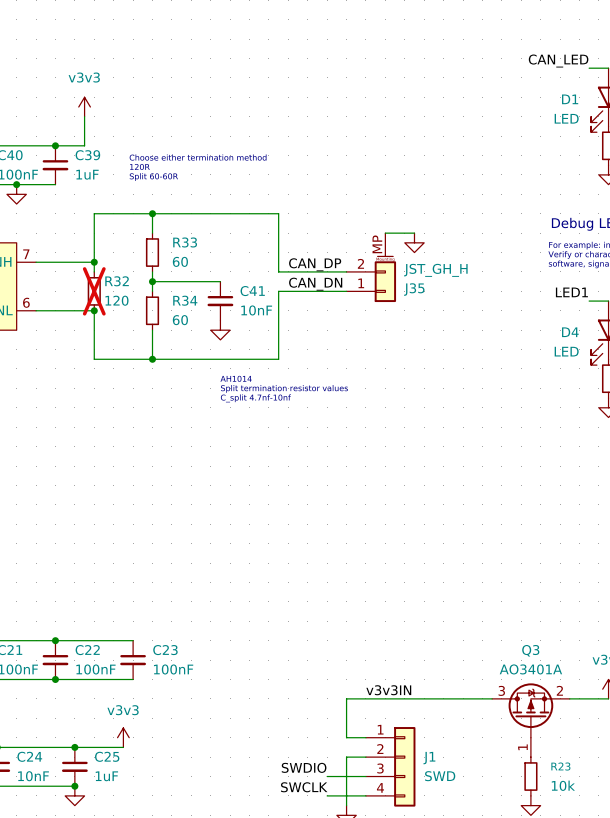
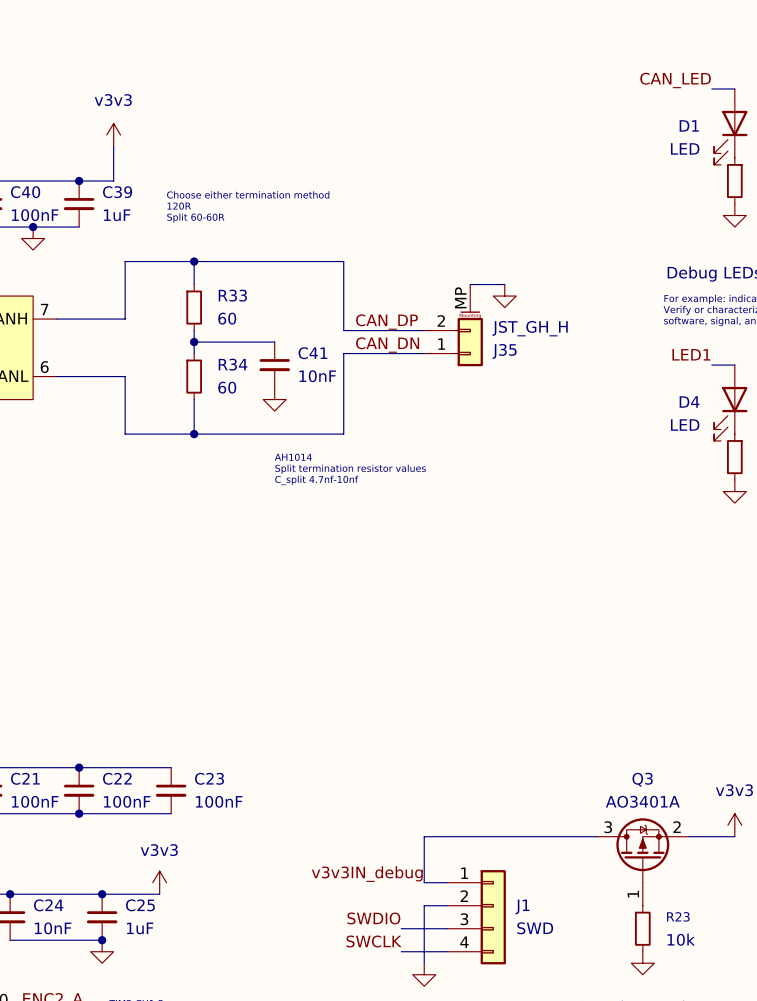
wire: (94, 262) (94, 271) -> none
junction: (94, 262) -> none
R32: 120 (94, 291) -> none
junction: (94, 310) -> none
label: v3v3IN (388, 690) -> none
label: none -> v3v3IN_debug (367, 874)

